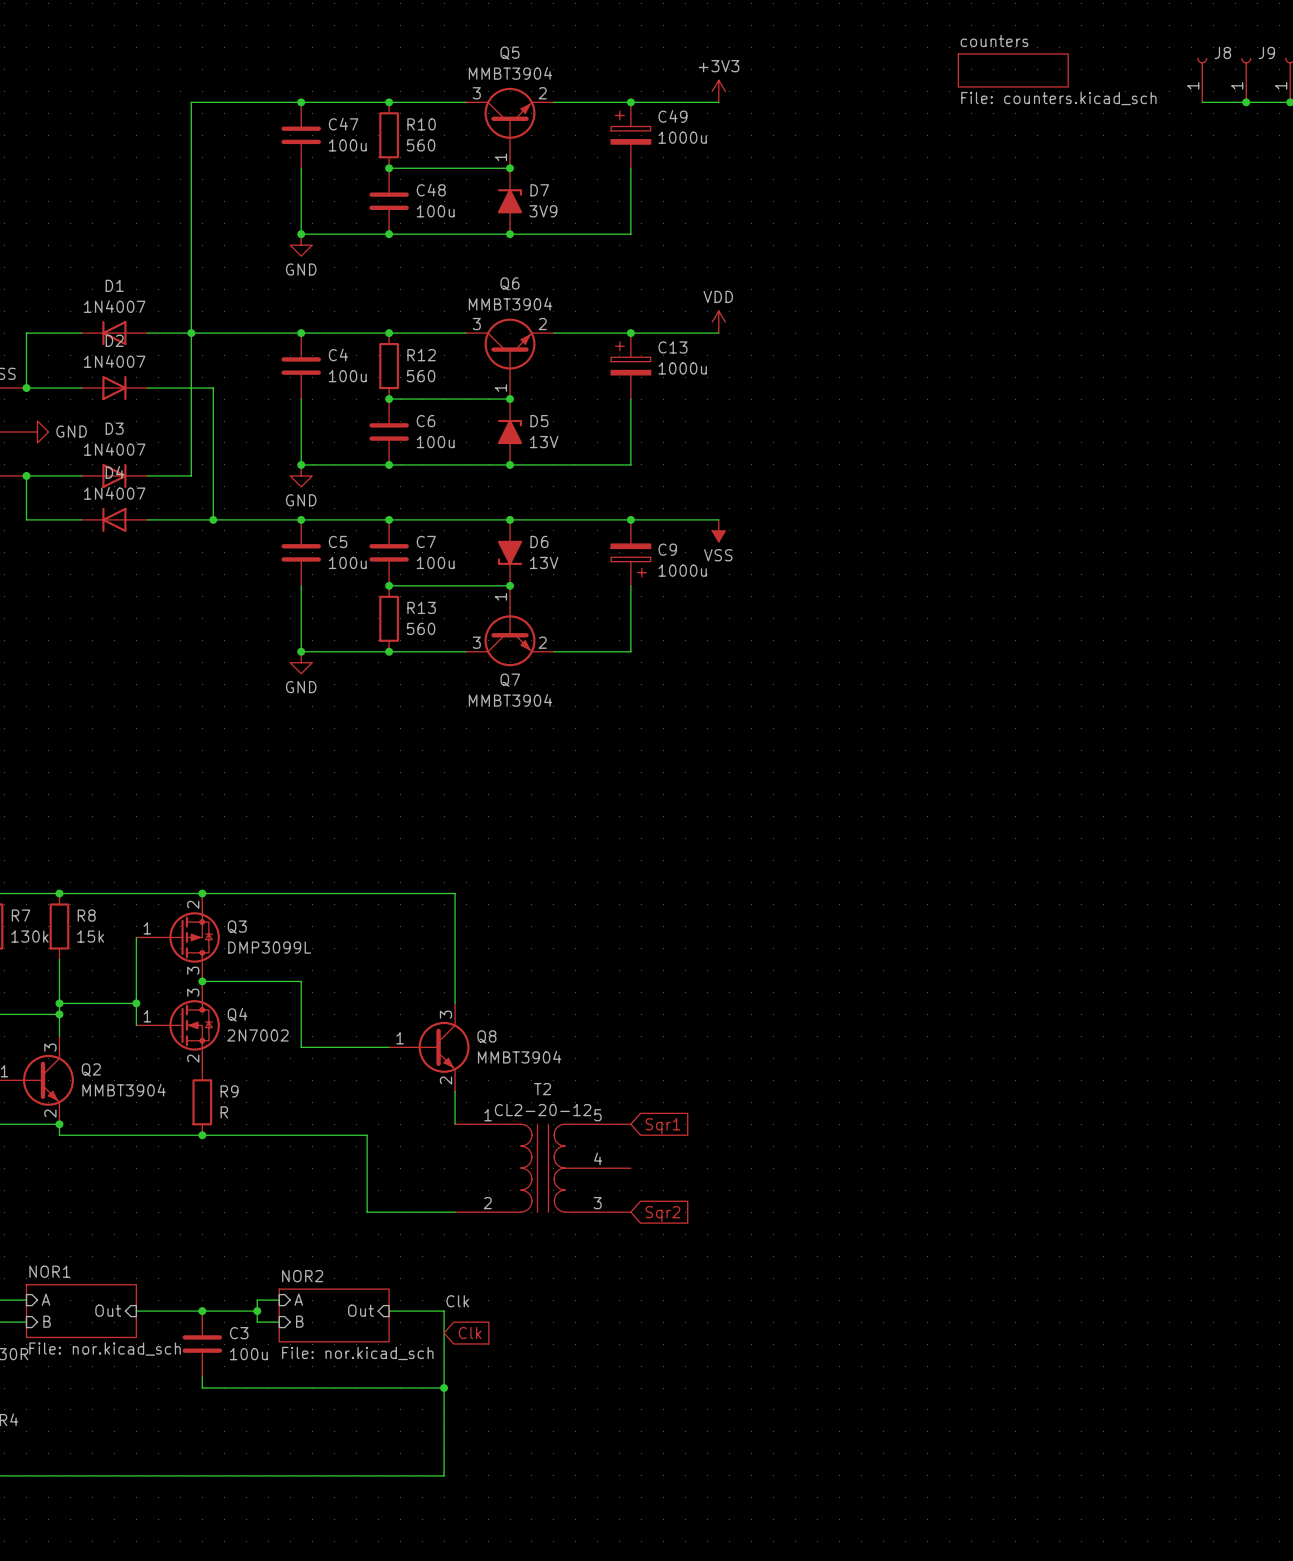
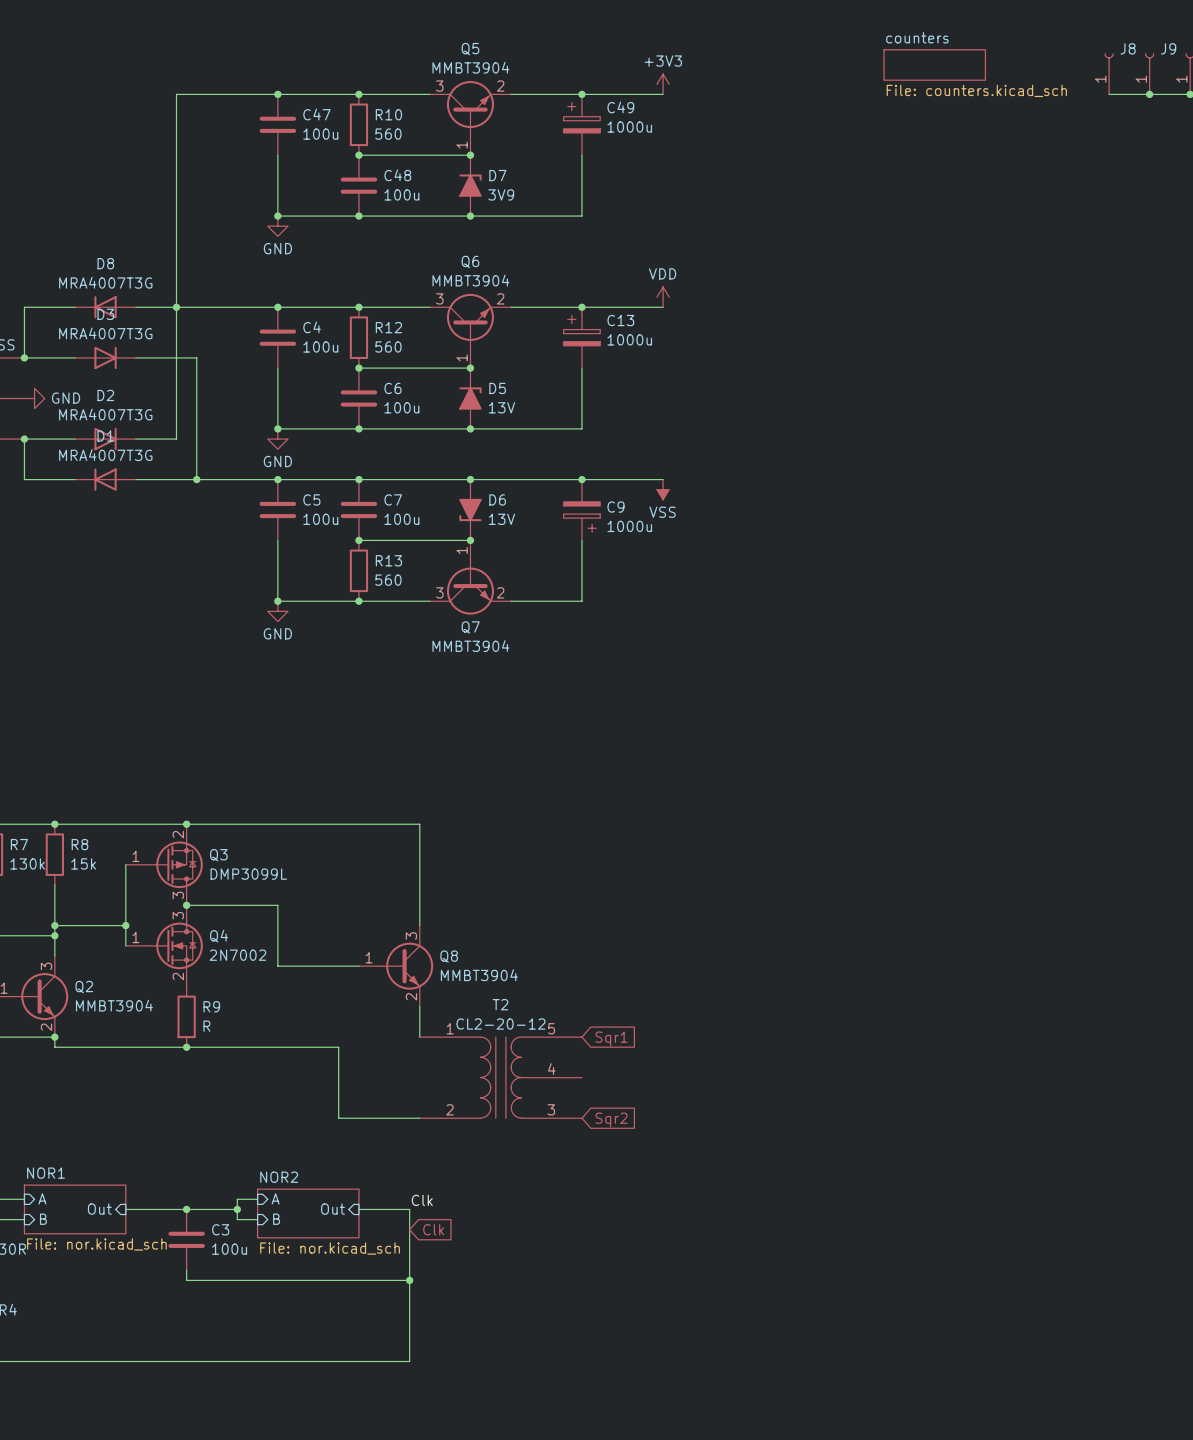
D1 name: D1 (114, 285) -> D8 (105, 263)
D1 value: 1N4007 (114, 306) -> MRA4007T3G (105, 282)
D2 name: D2 (114, 340) -> D3 (105, 314)
D2 value: 1N4007 (114, 361) -> MRA4007T3G (105, 333)
D3 name: D3 (114, 428) -> D2 (105, 395)
D3 value: 1N4007 (114, 449) -> MRA4007T3G (105, 414)
D4 name: D4 (114, 472) -> D1 (105, 436)
D4 value: 1N4007 (114, 493) -> MRA4007T3G (105, 455)

